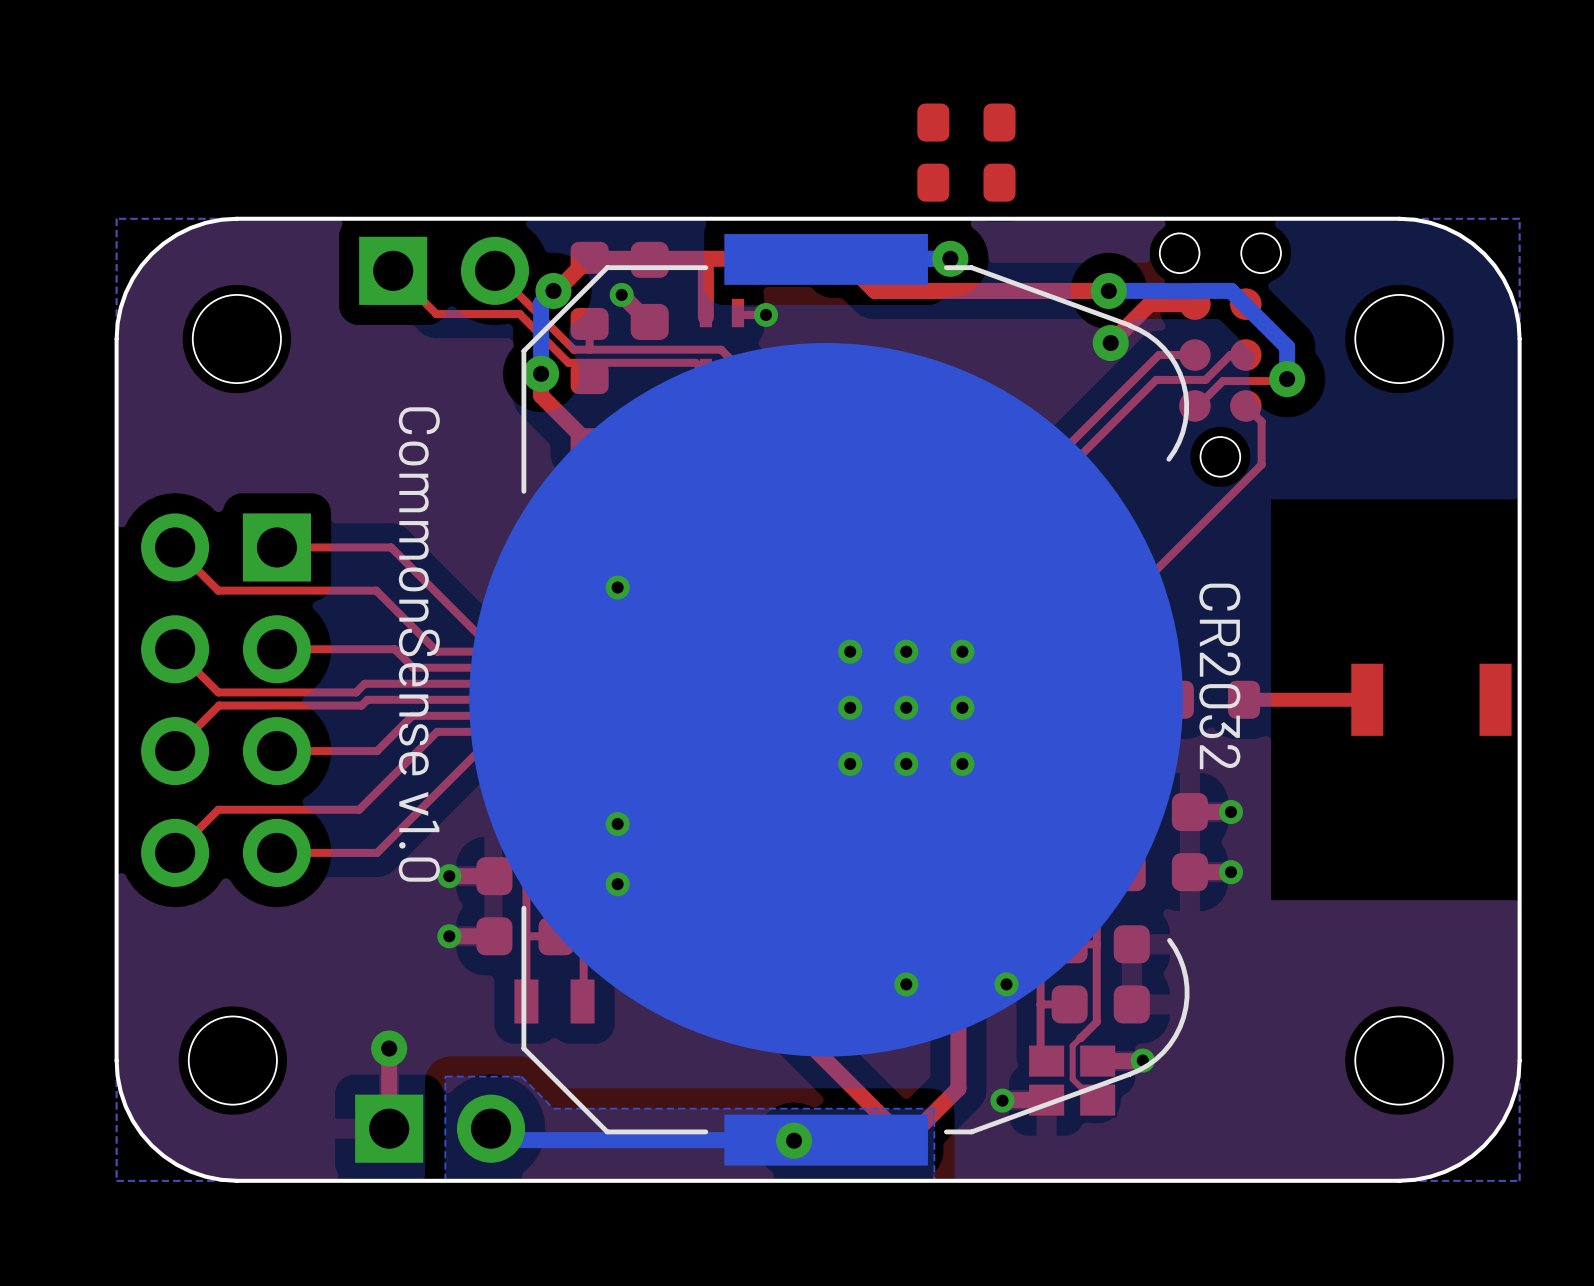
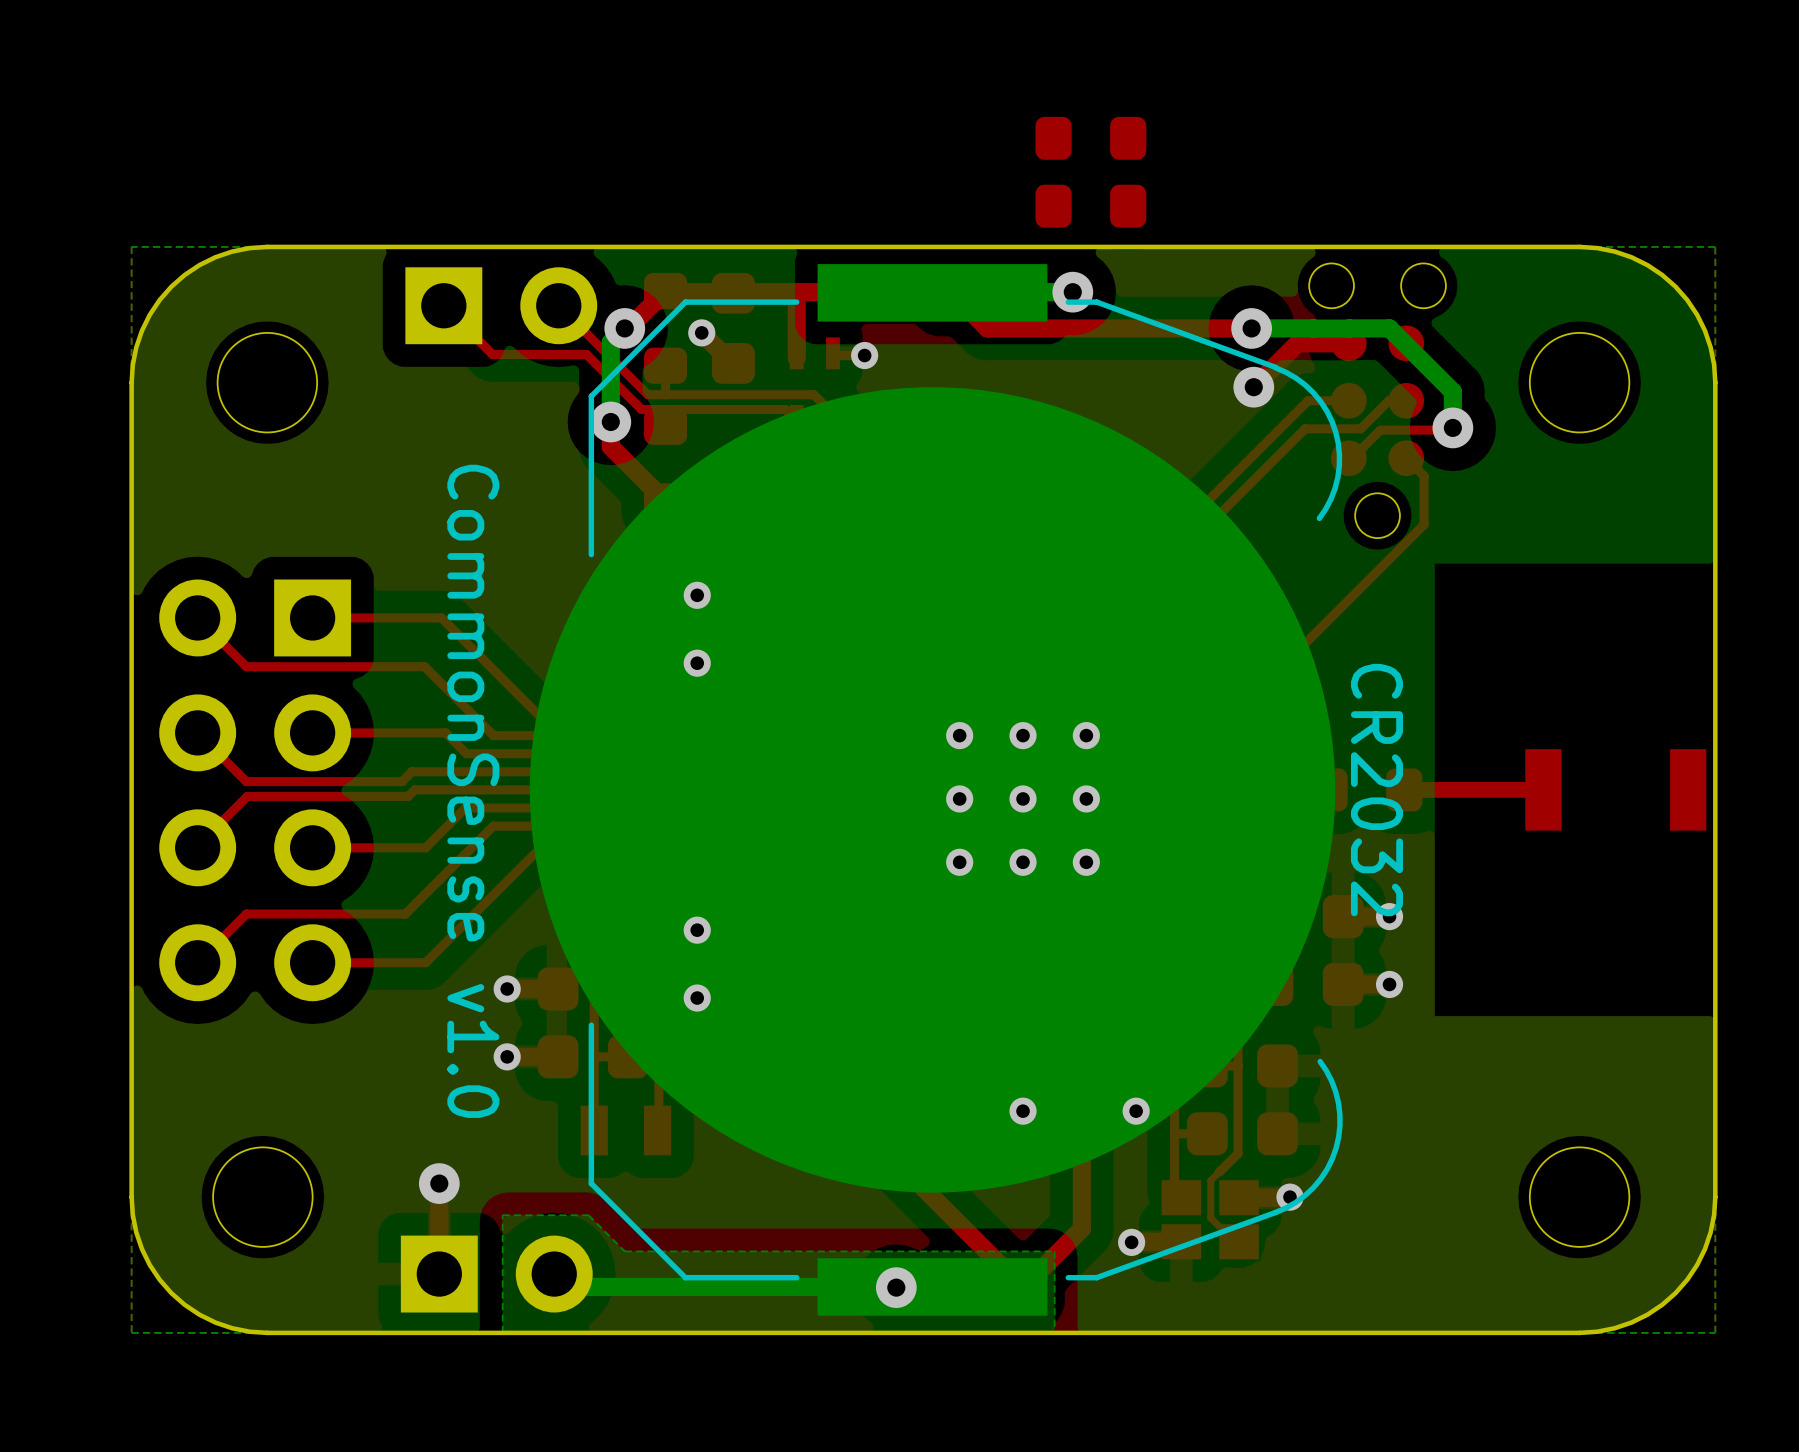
via: none -> (697, 595)

